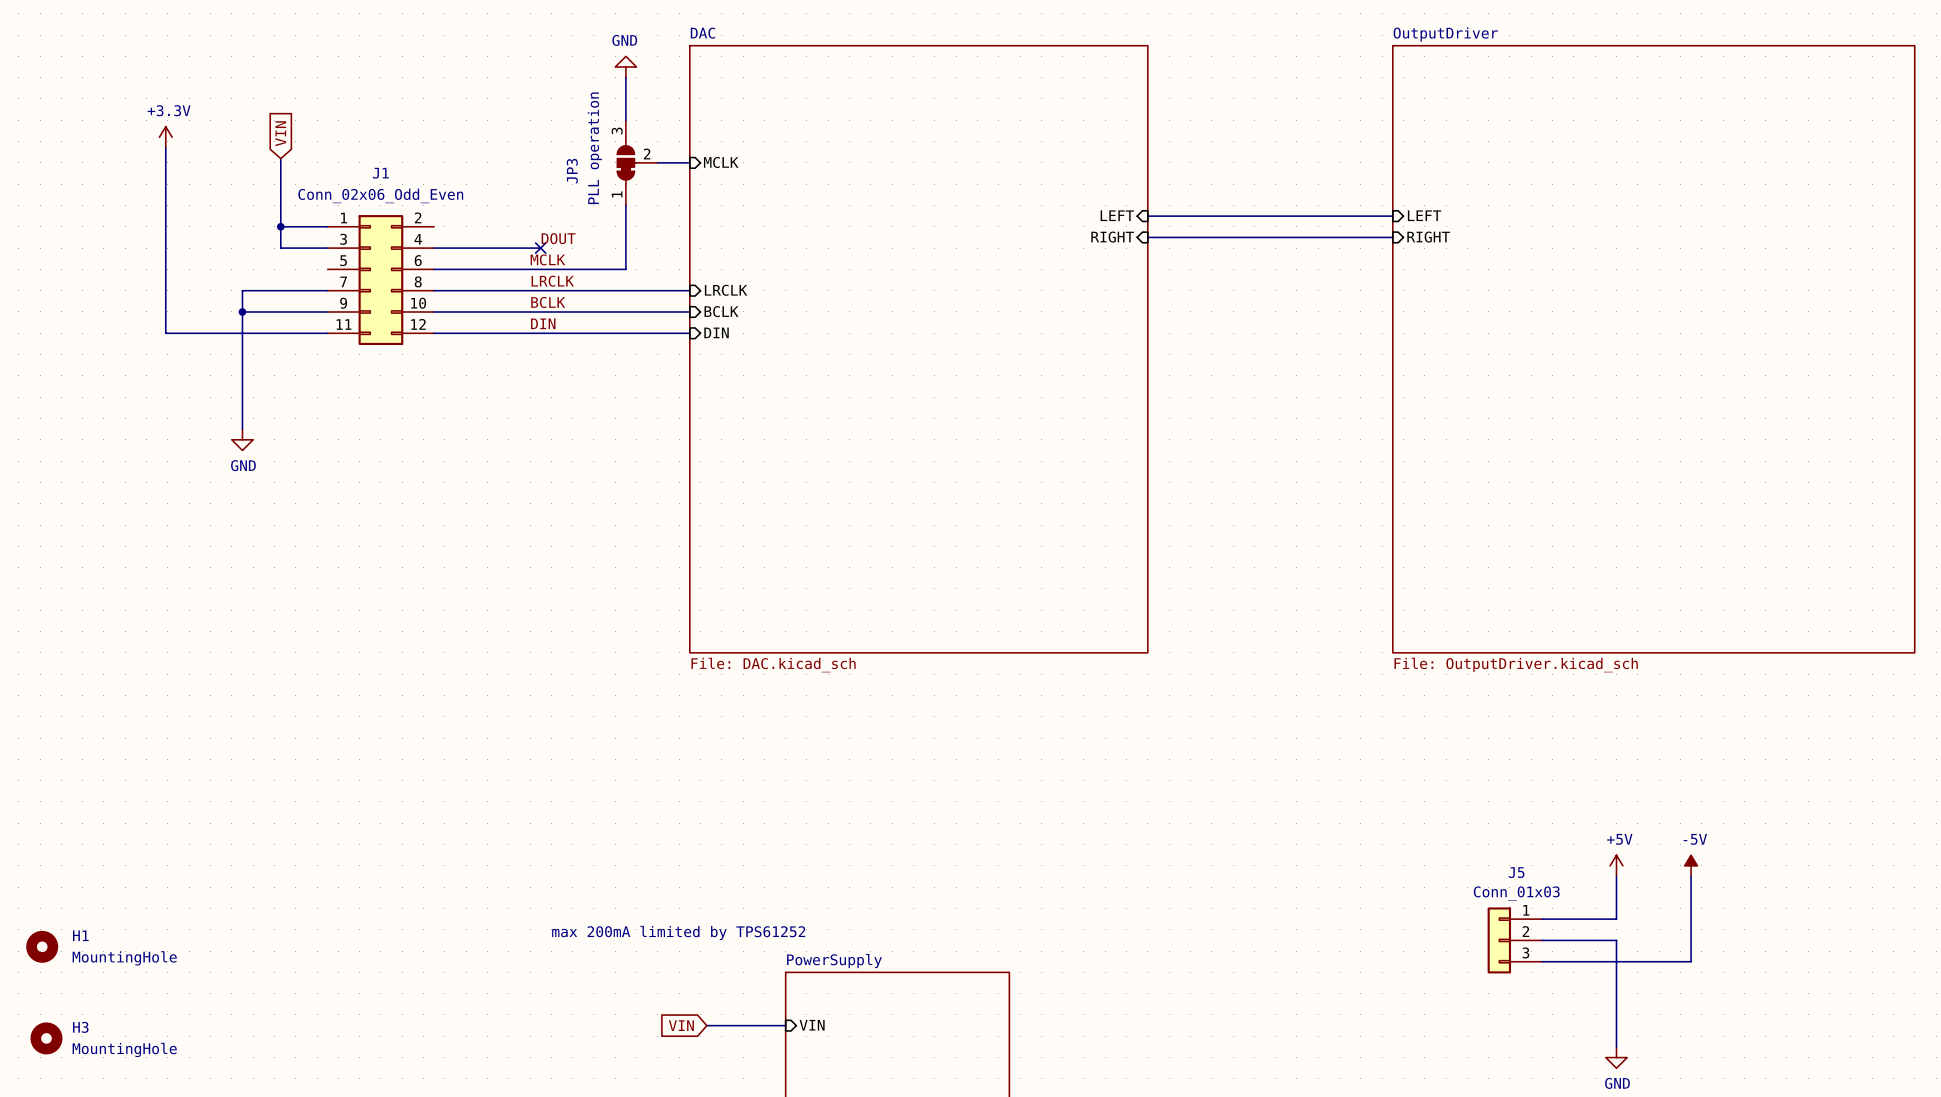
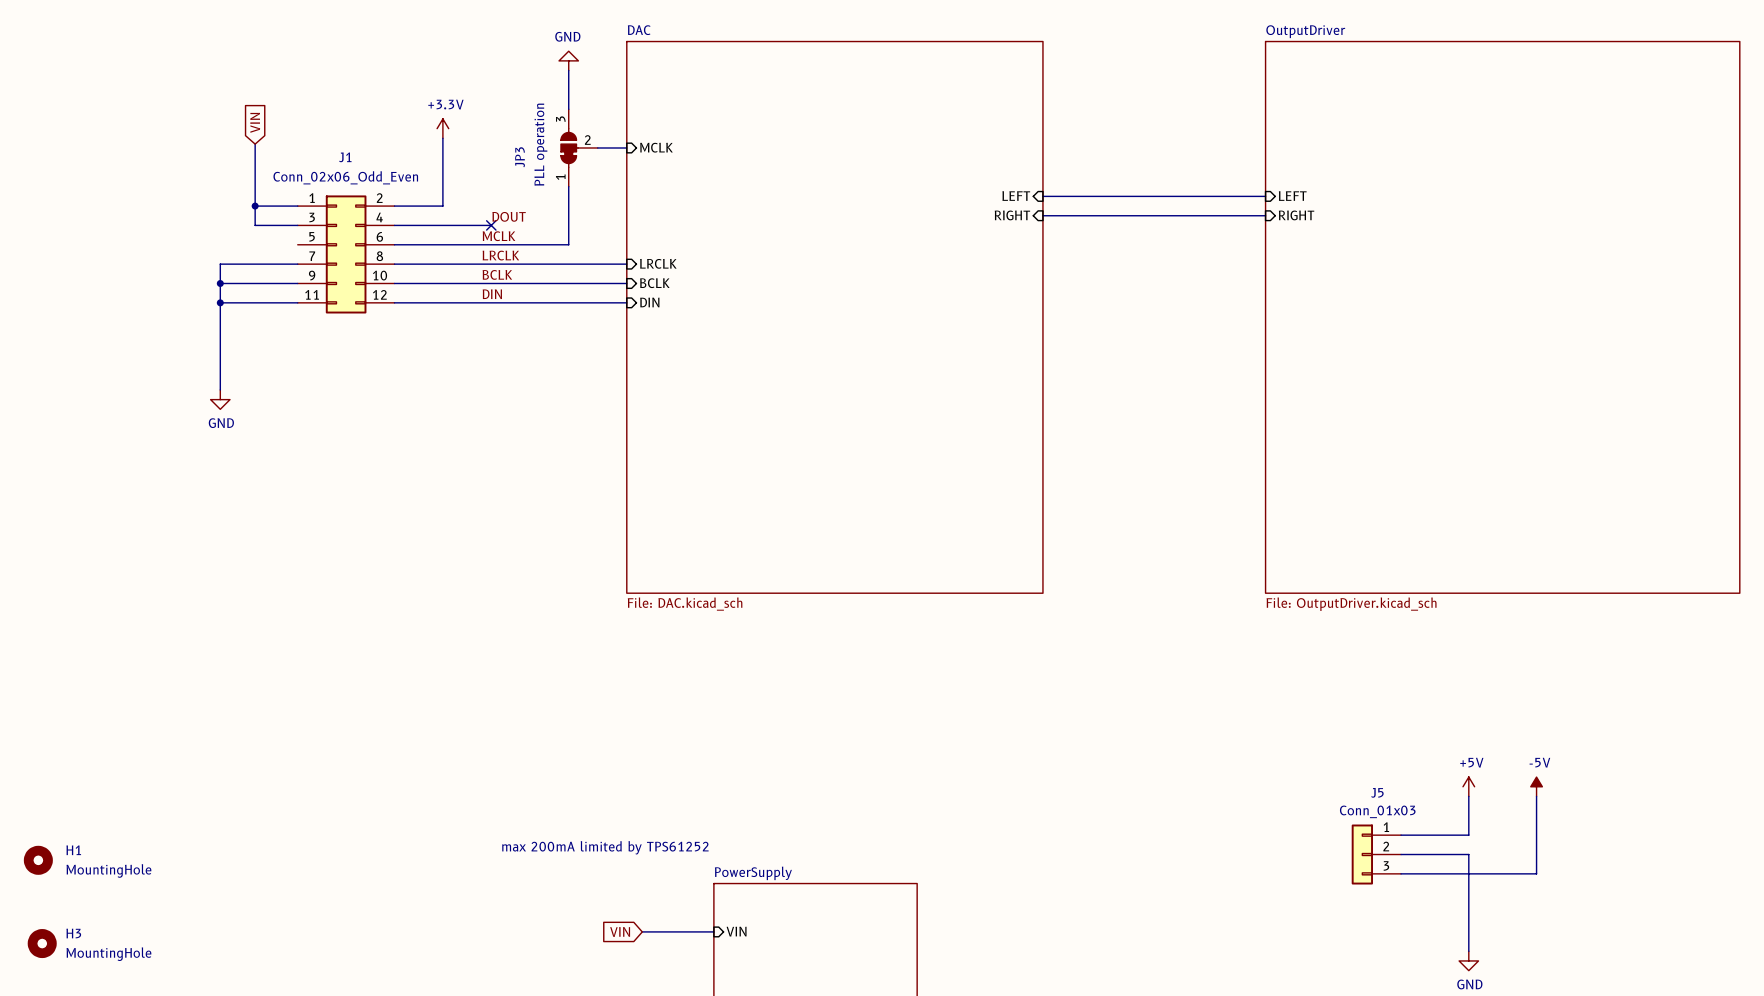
power symbol: +3.3V (165, 137) -> none
power symbol: none -> +3.3V (442, 128)
wire: (165, 147) (165, 333) (242, 333) -> none
wire: none -> (442, 138) (442, 206) (394, 206)
junction: none -> (220, 302)

